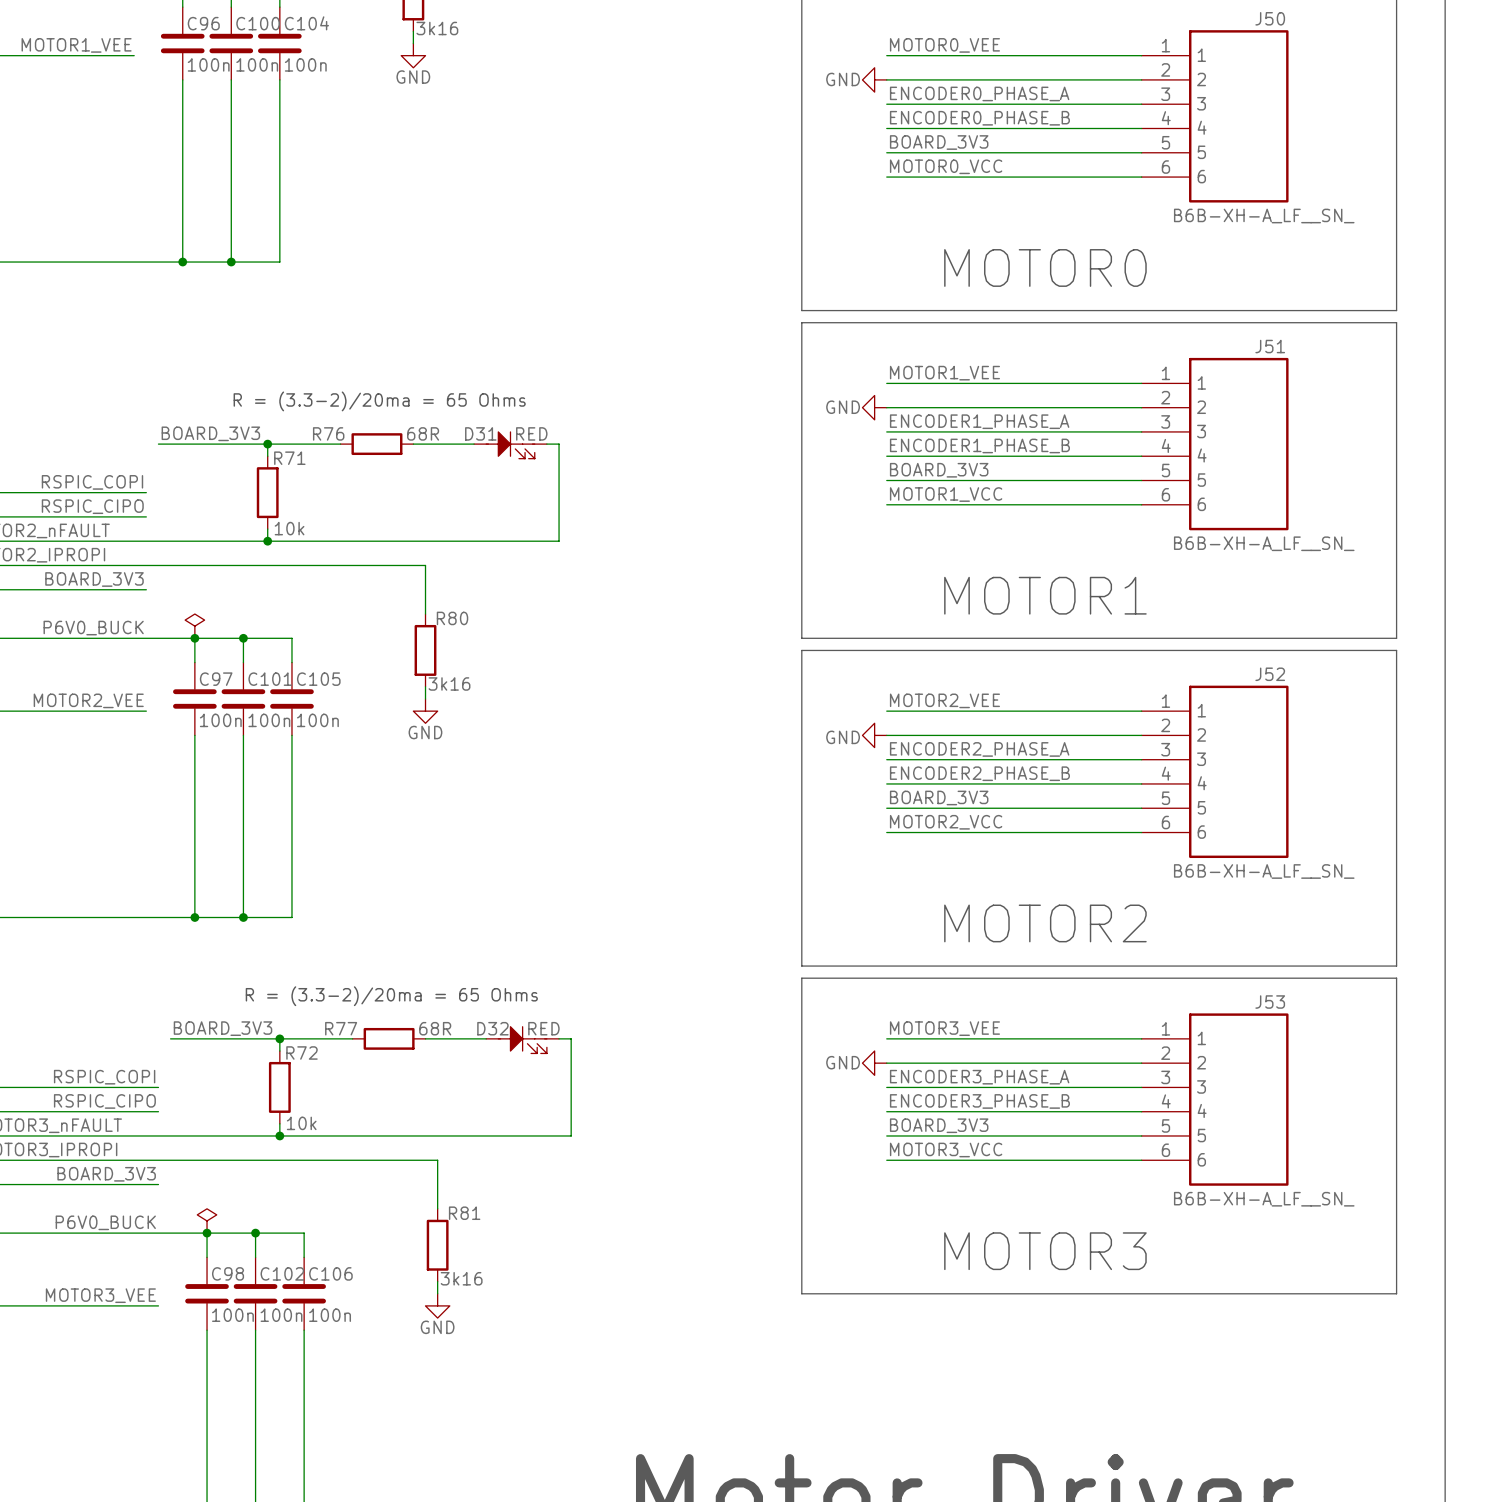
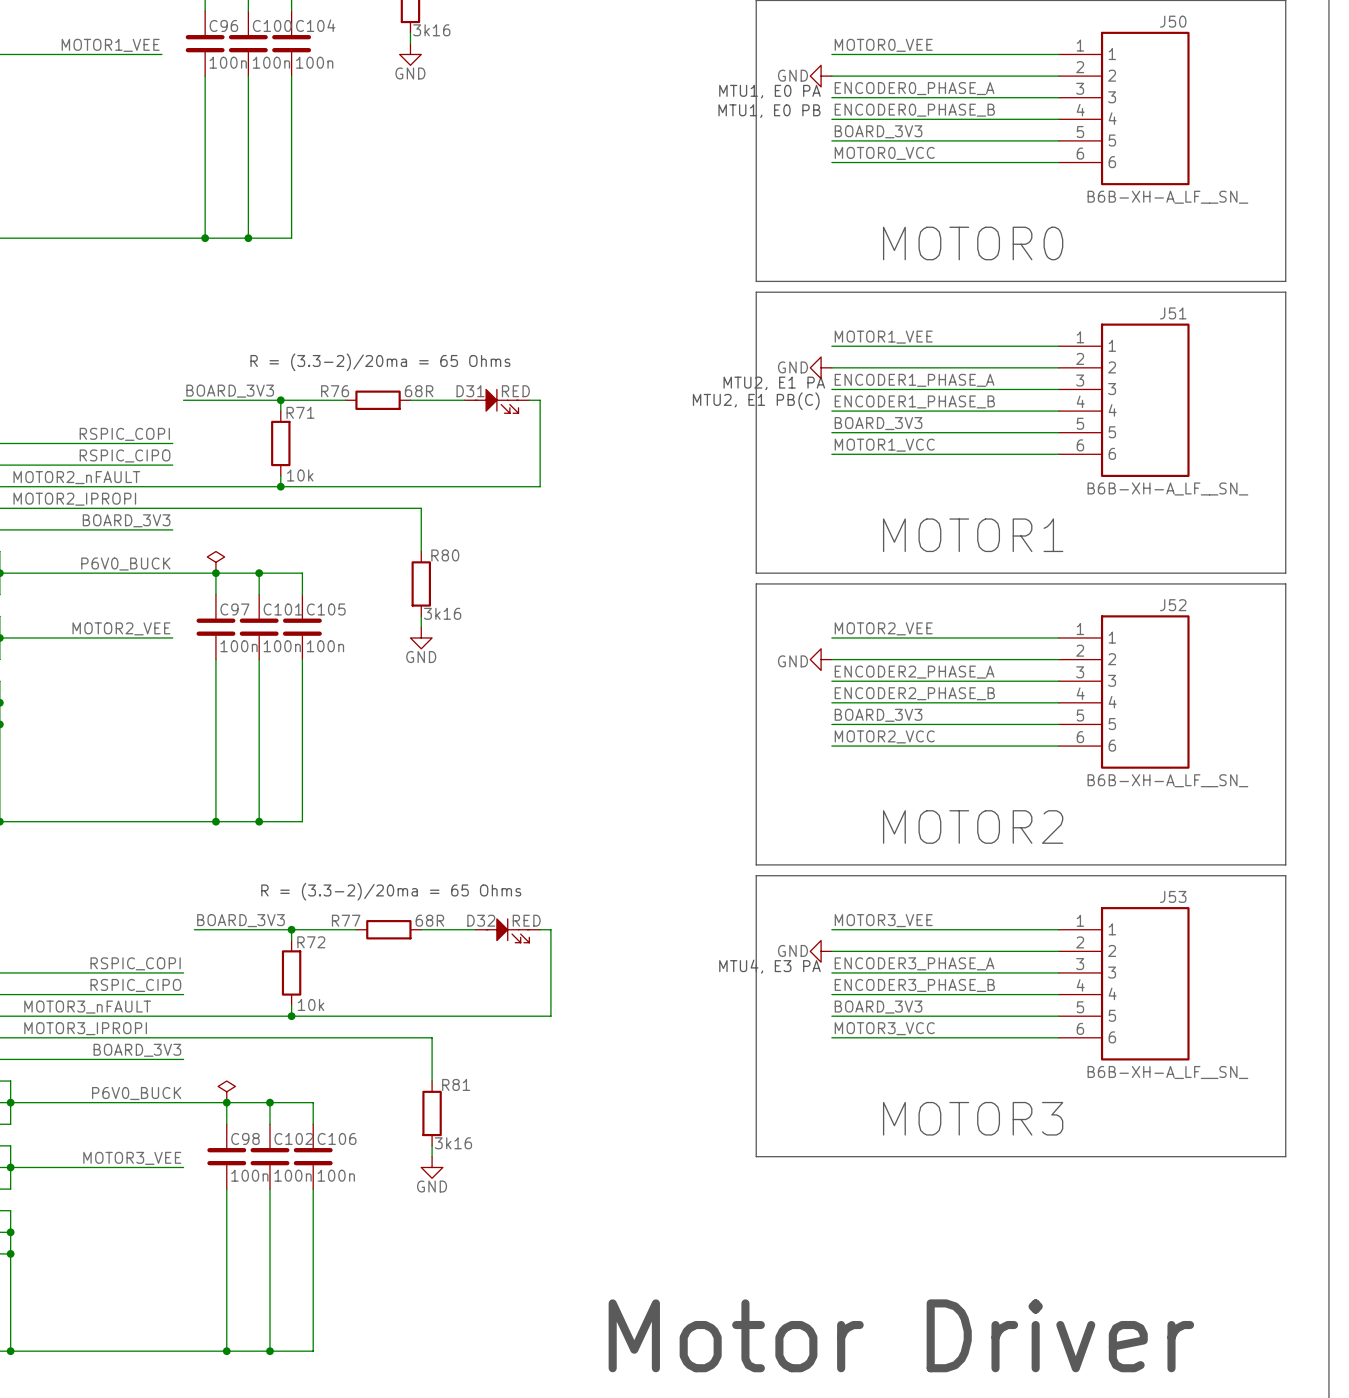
text: none -> MTU1, E0 PA (769, 91)
text: none -> MTU1, E0 PB (769, 111)
text: none -> MTU2, E1 PA (774, 383)
text: none -> MTU2, E1 PB(C) (756, 401)
text: none -> MTU4, E3 PA (769, 966)

